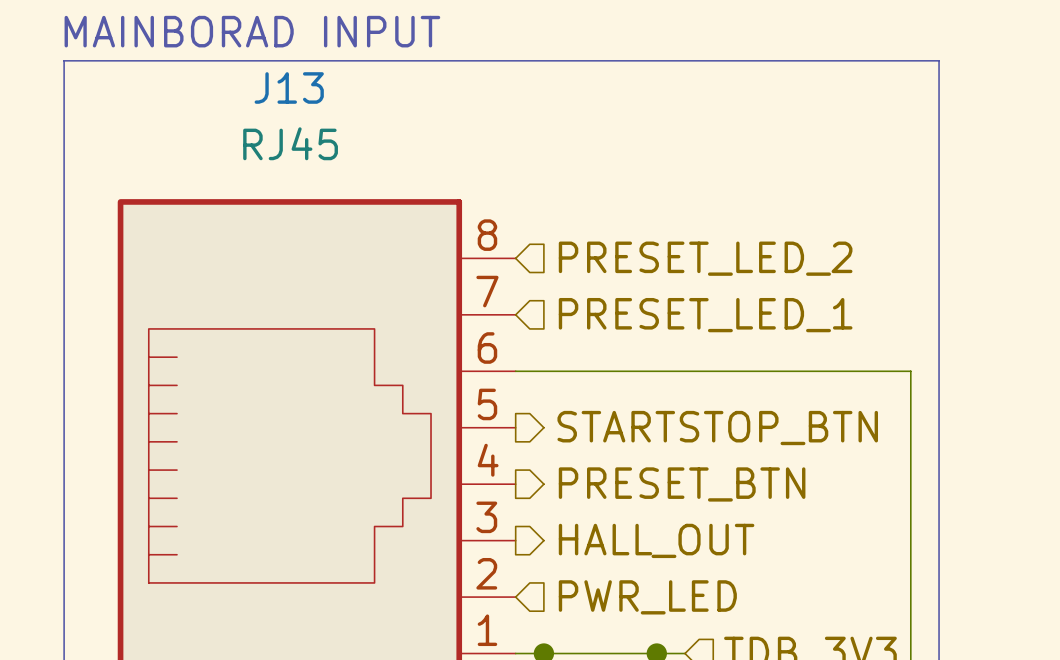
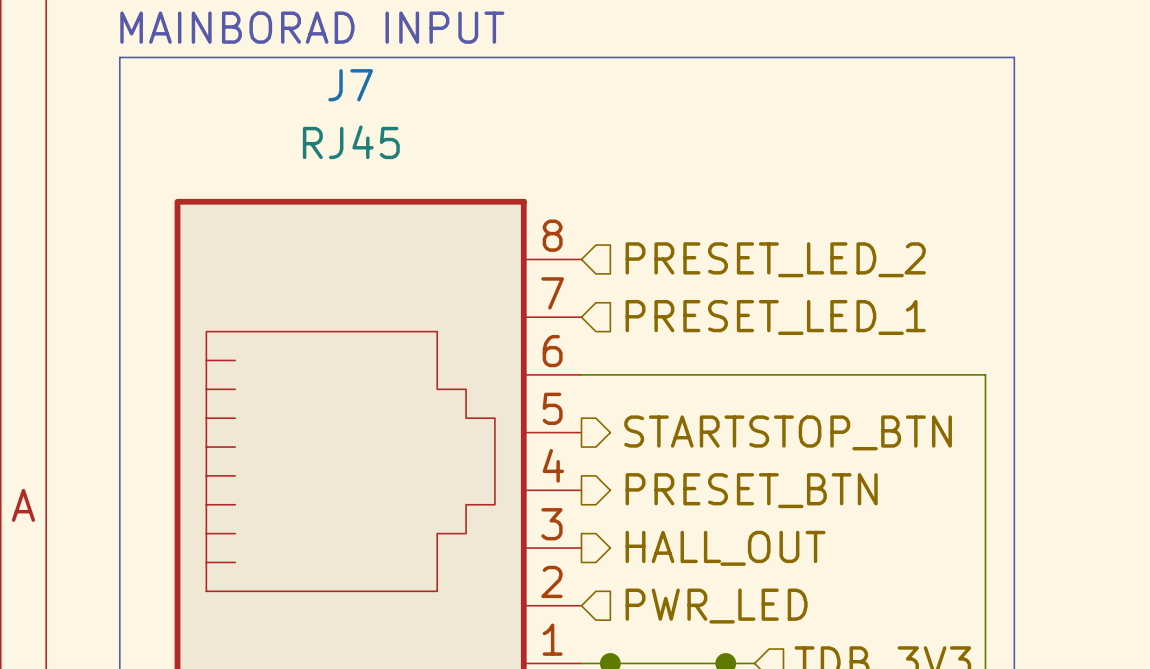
J13 name: J13 (289, 87) -> J7 (350, 85)

